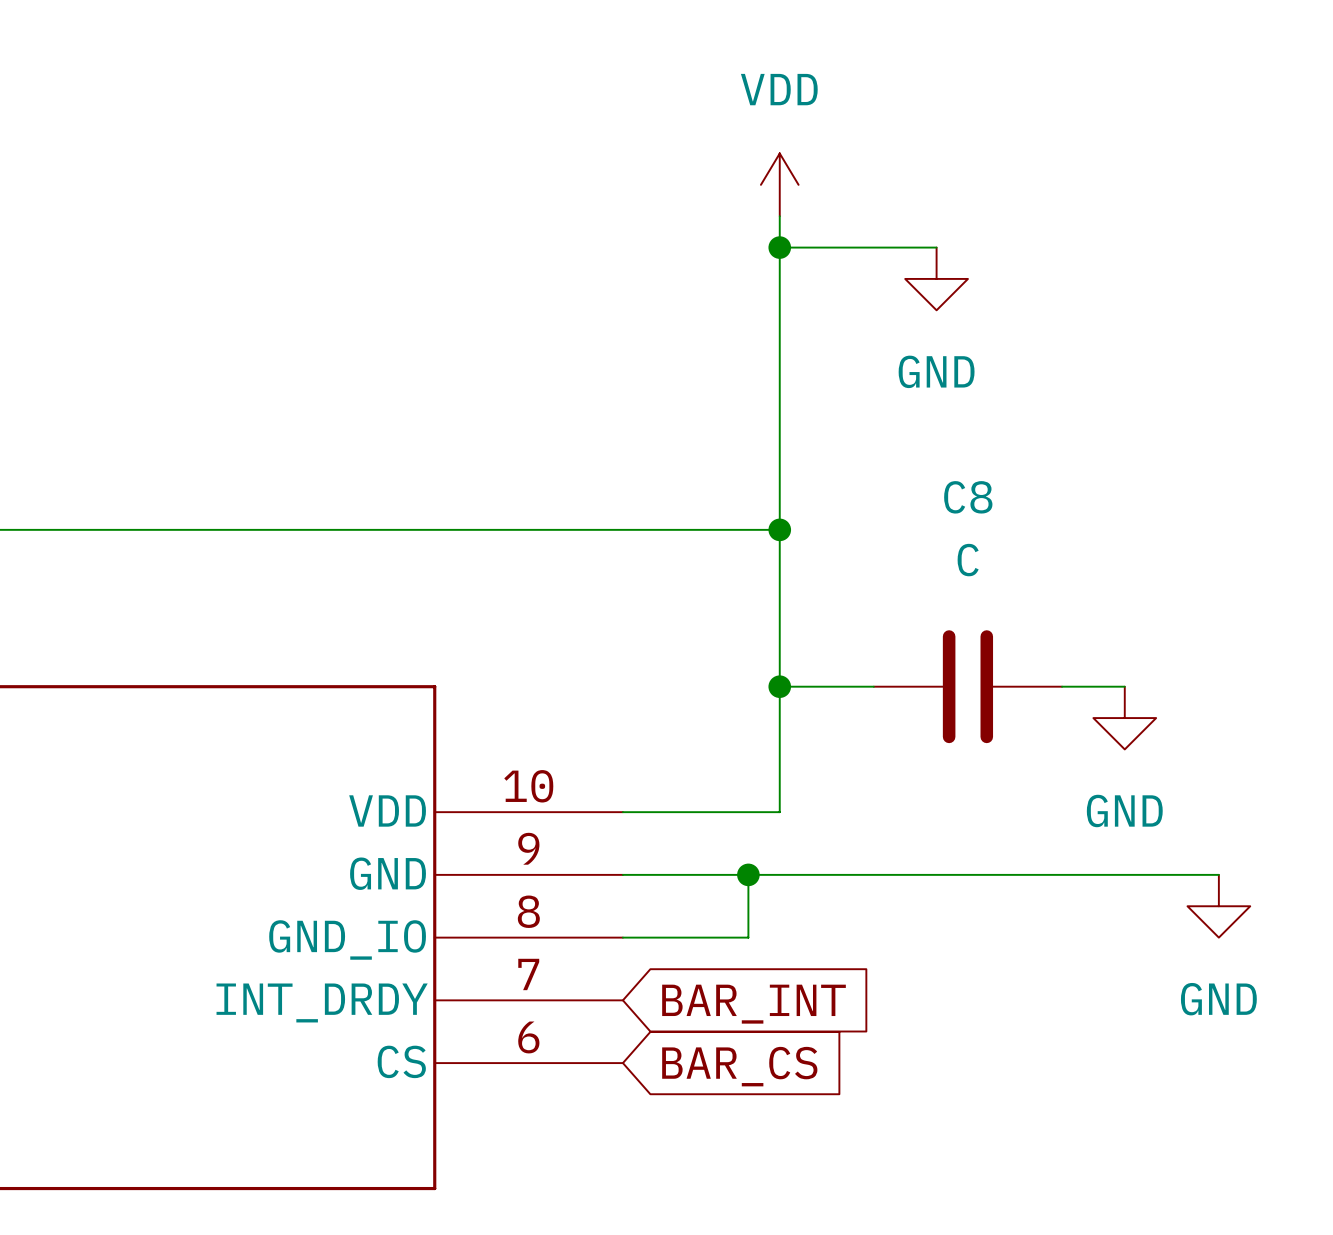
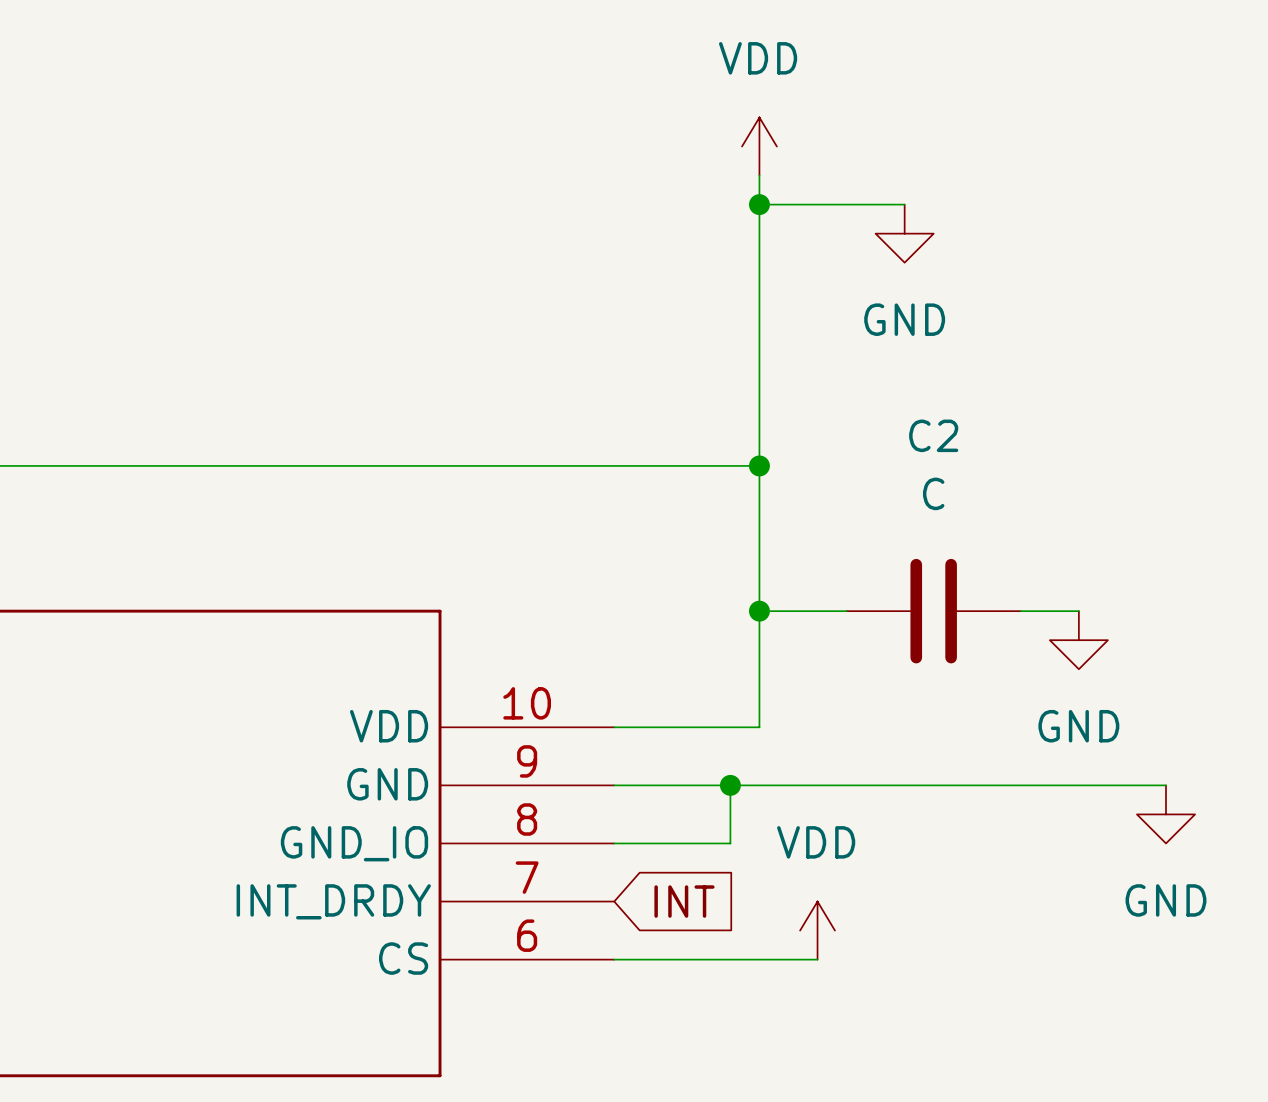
C8 name: C8 (968, 497) -> C2 (933, 435)
global label: BAR_INT (754, 1004) -> INT (684, 901)
power symbol: none -> VDD (817, 930)
wire: none -> (614, 959) (817, 959)
global label: BAR_CS (739, 1066) -> none

